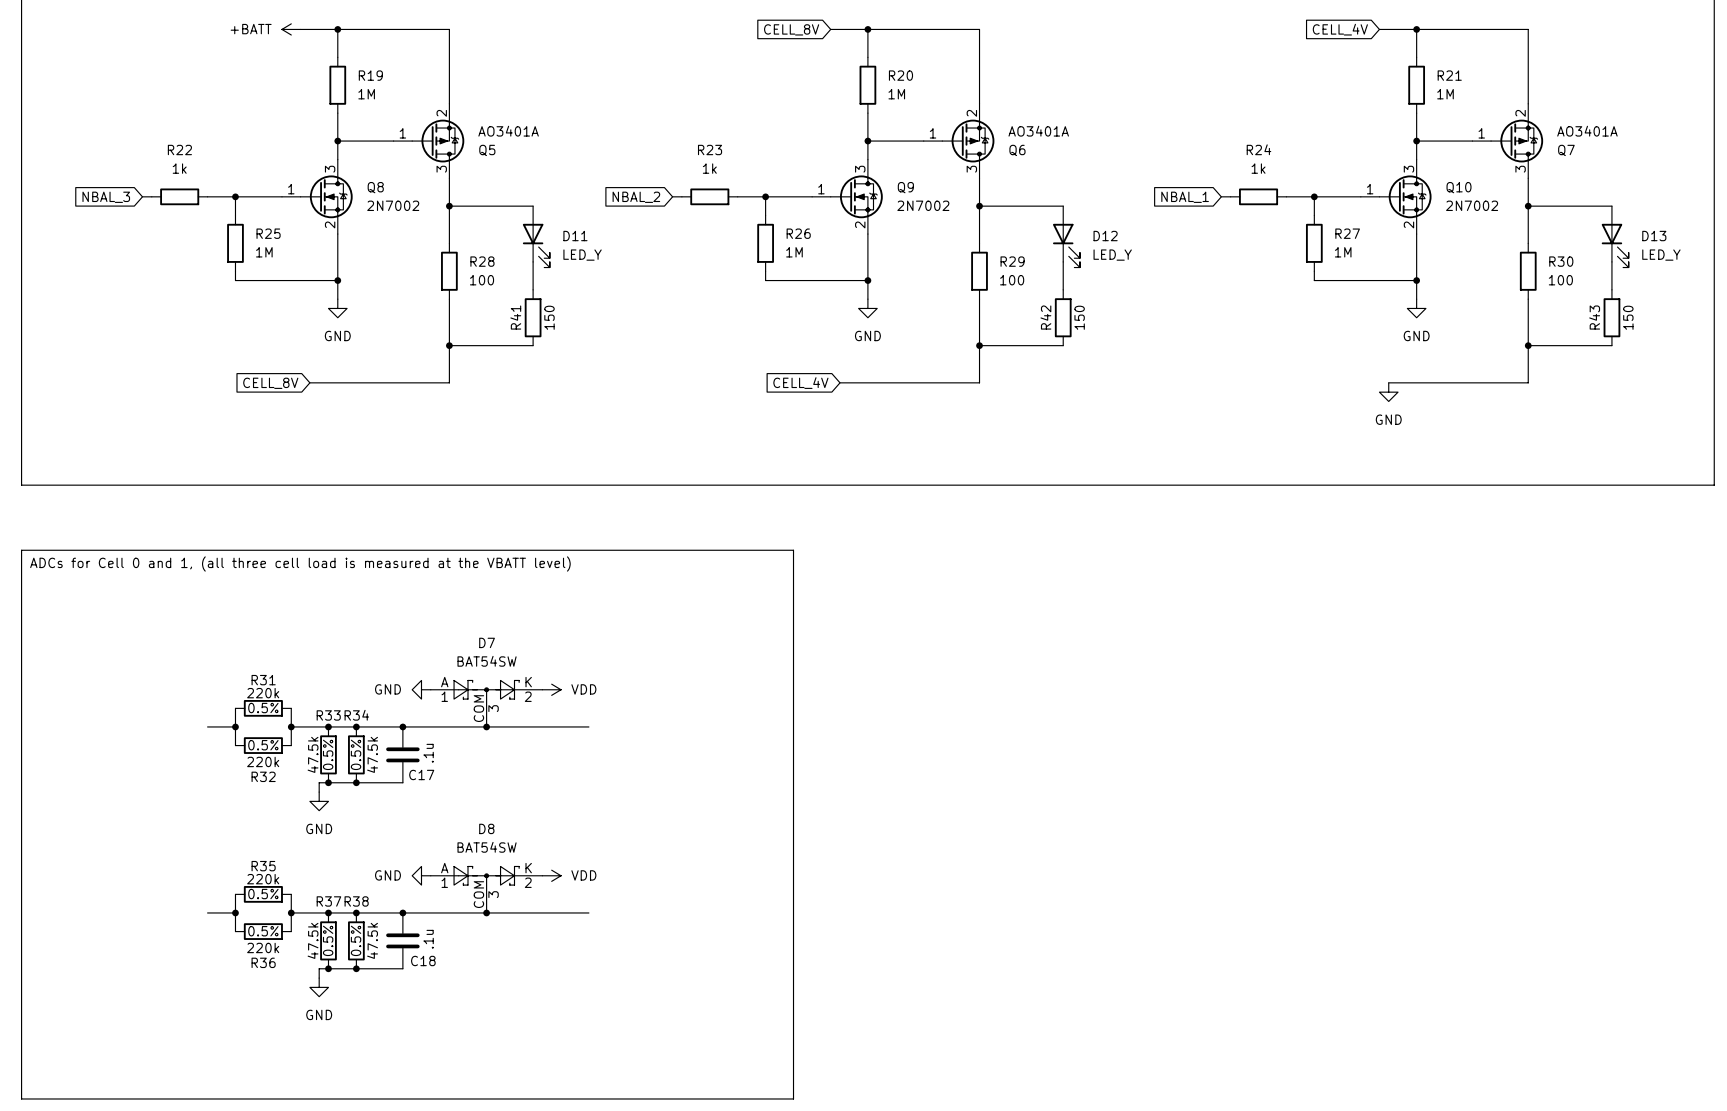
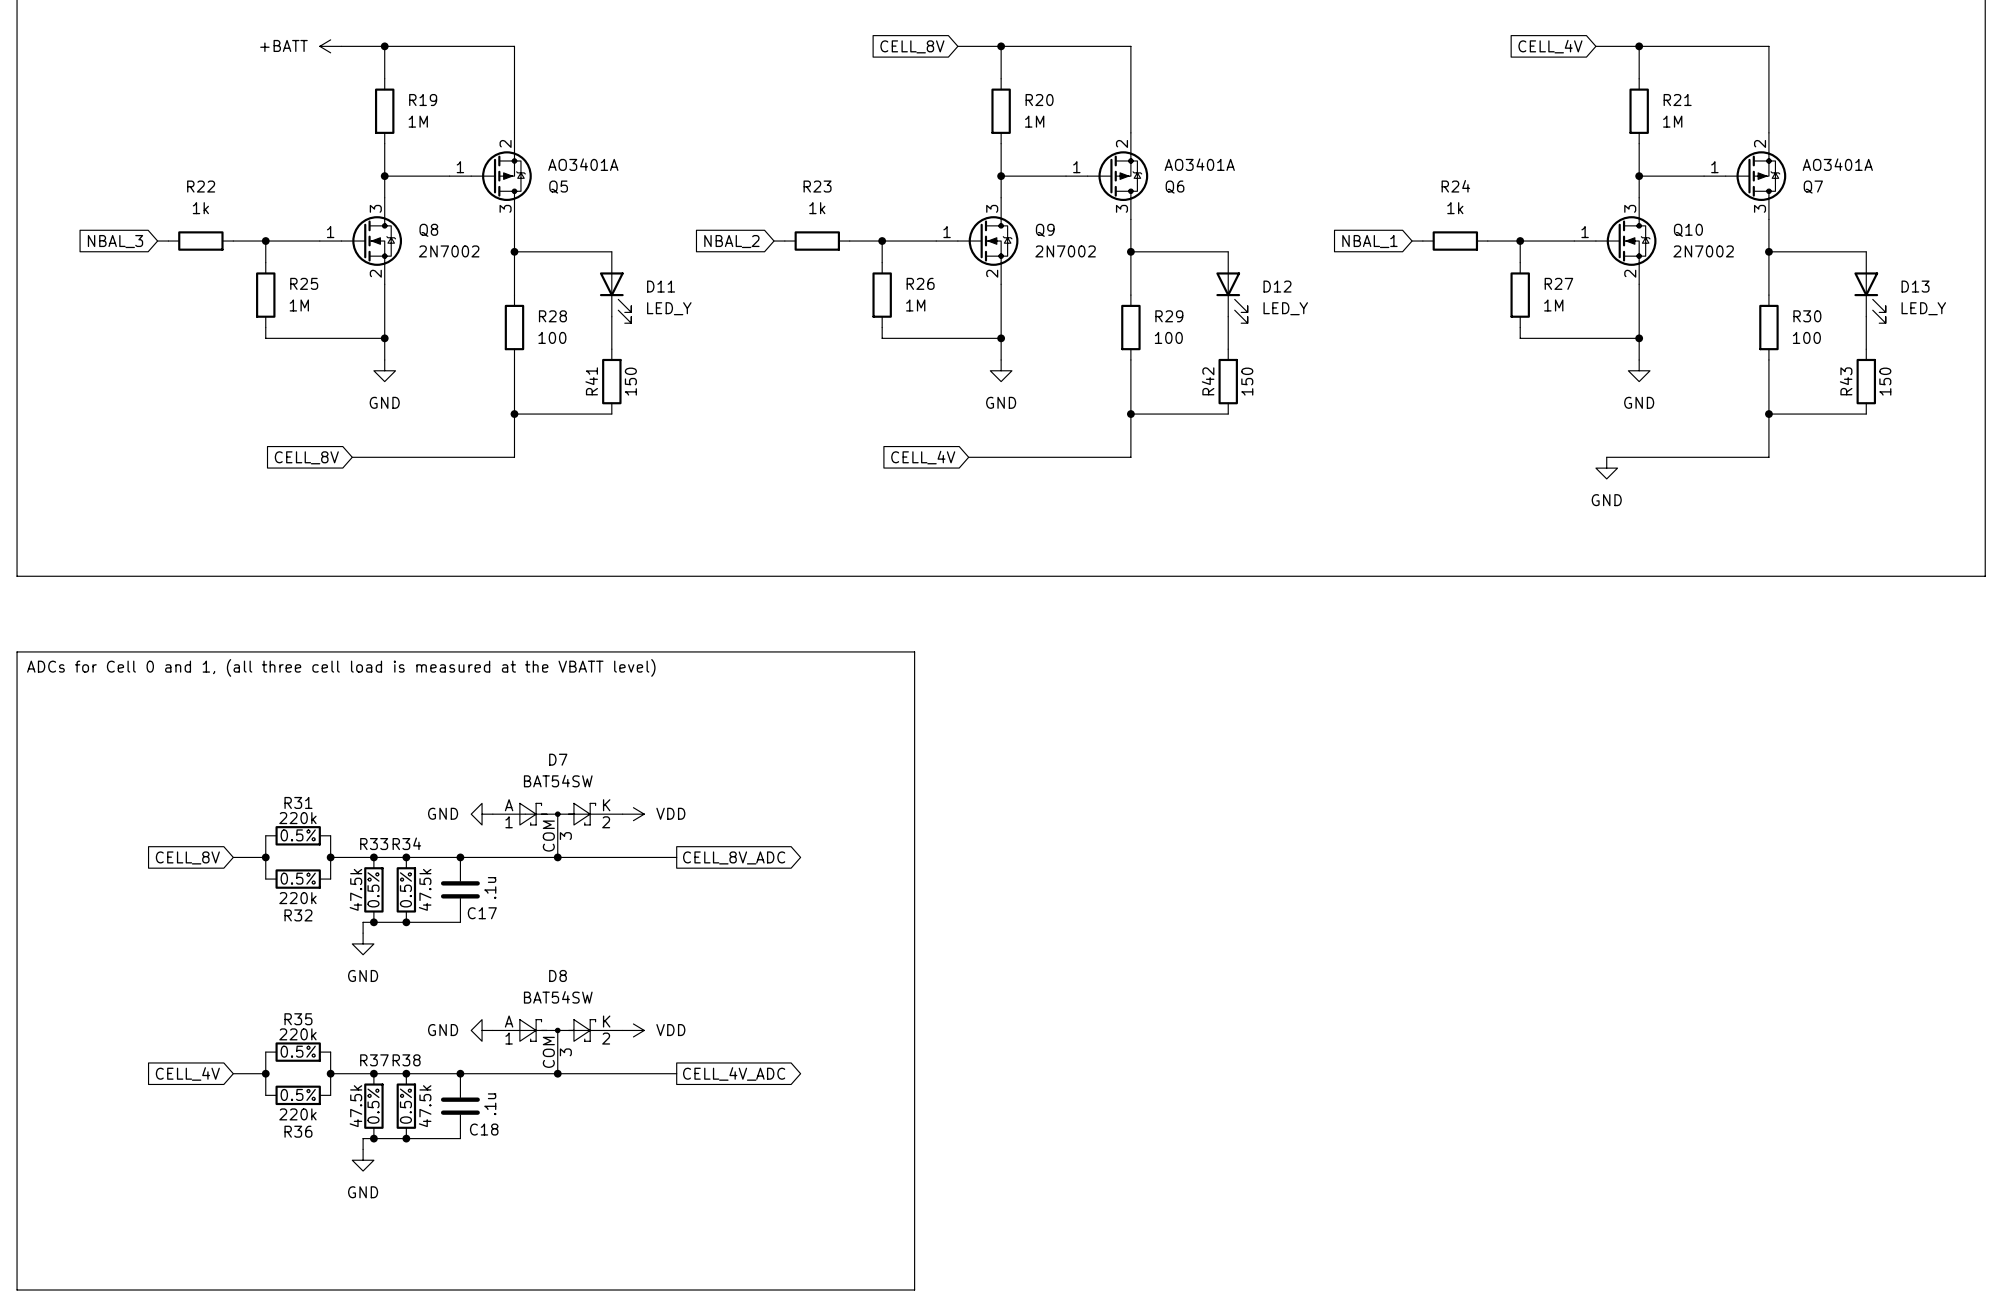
global label: none -> CELL_8V (187, 857)
global label: none -> CELL_8V_ADC (734, 857)
global label: none -> CELL_4V (187, 1073)
global label: none -> CELL_4V_ADC (734, 1073)

